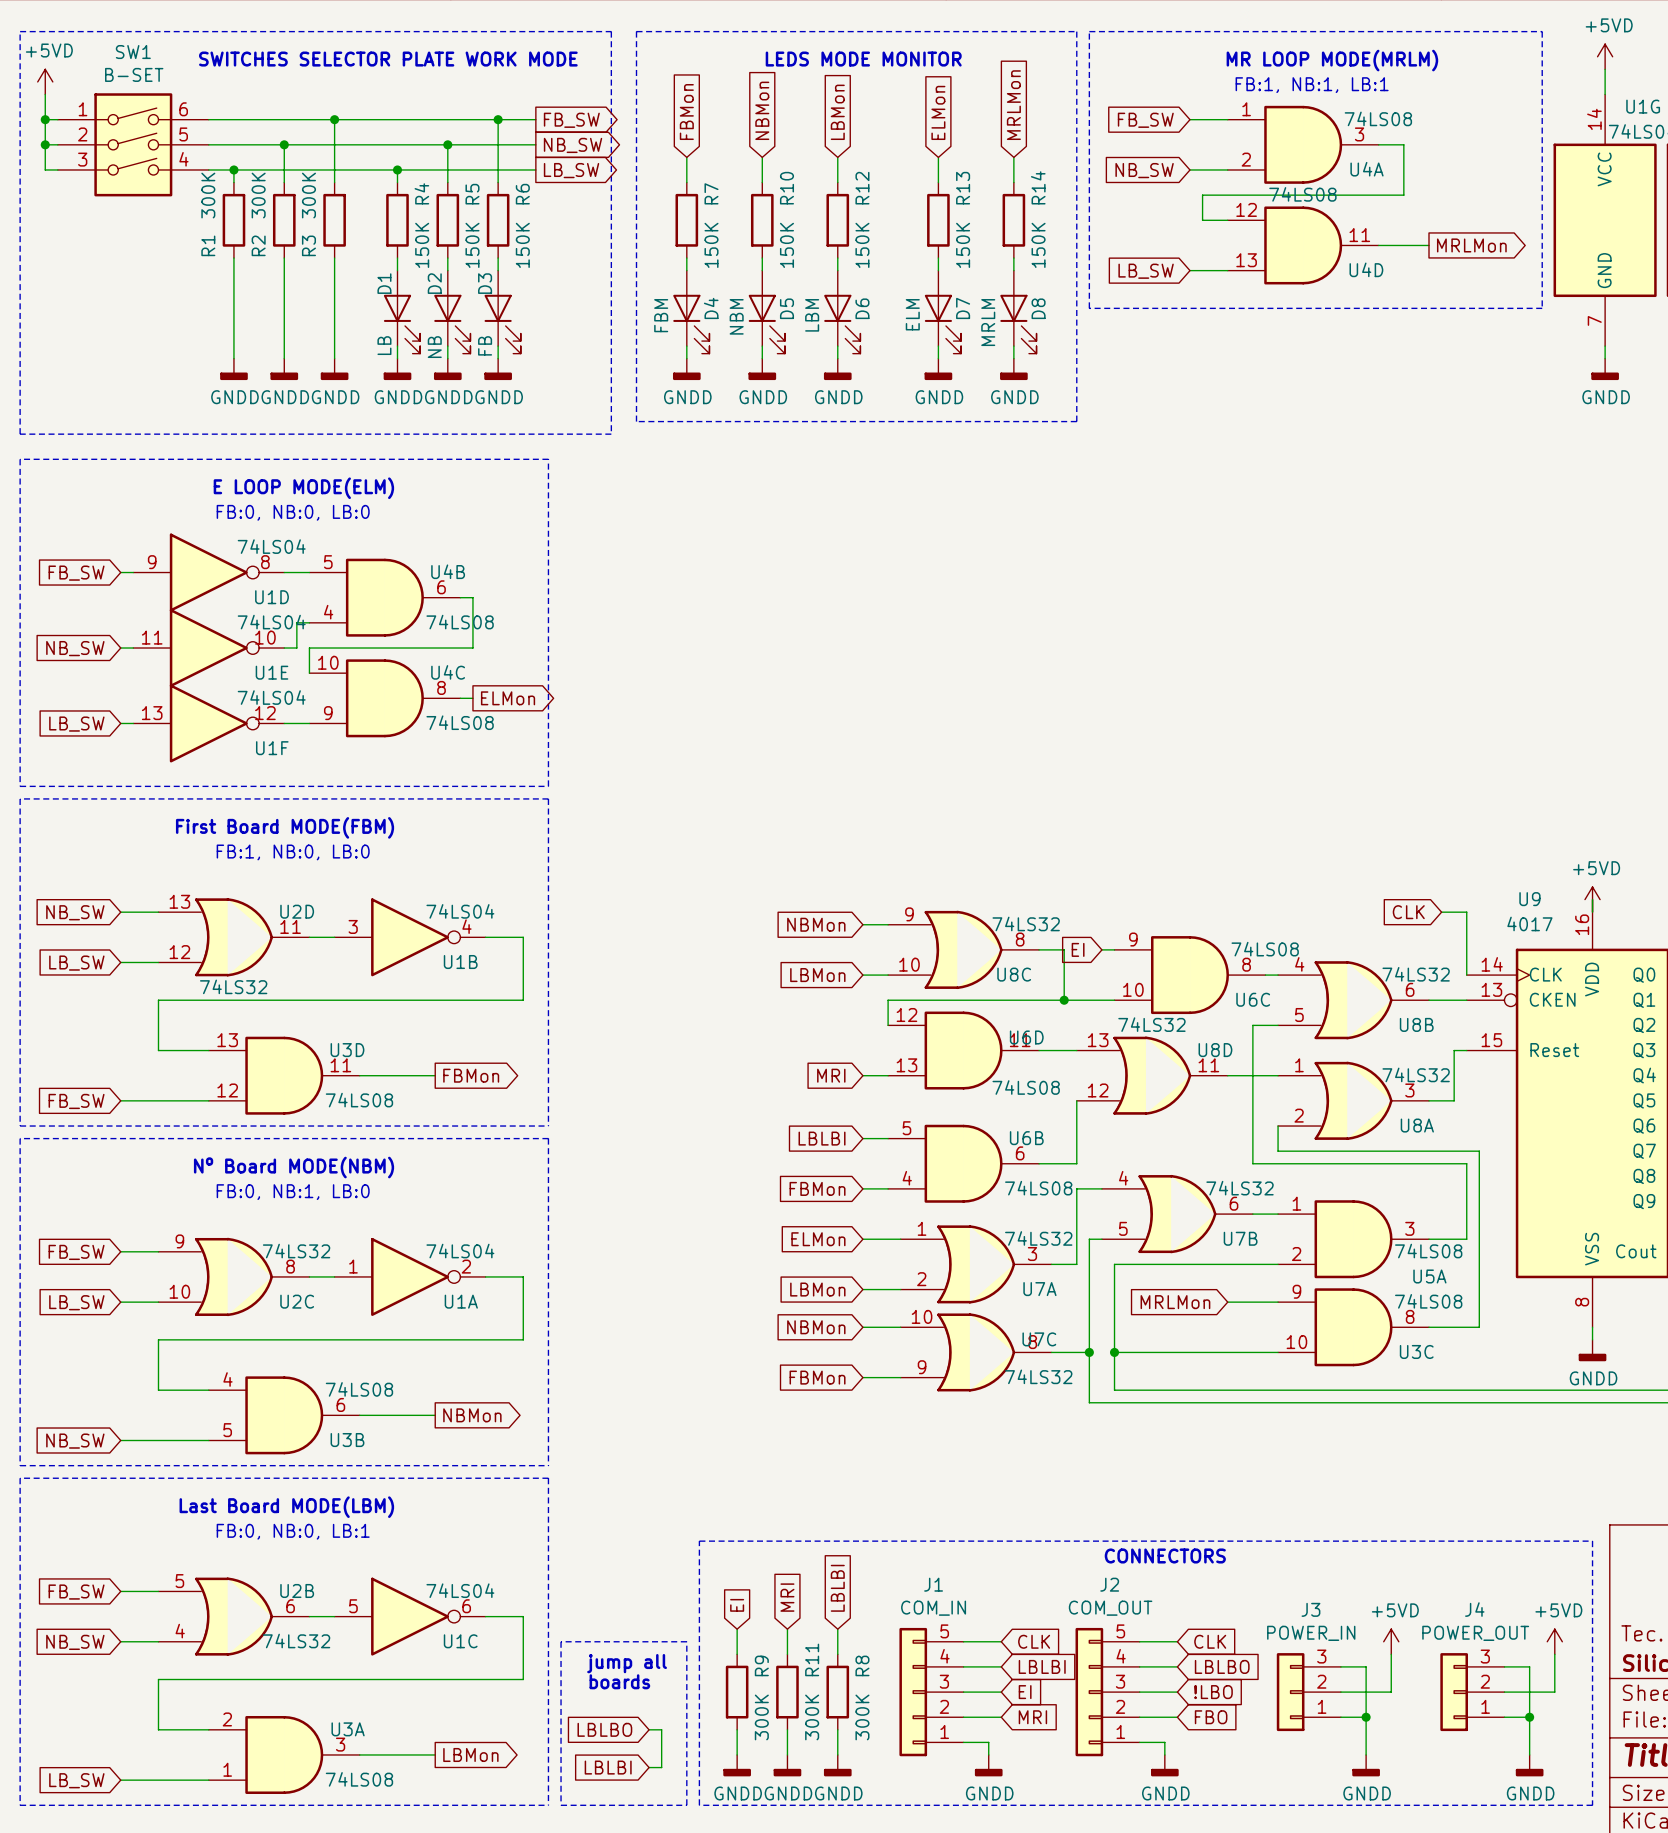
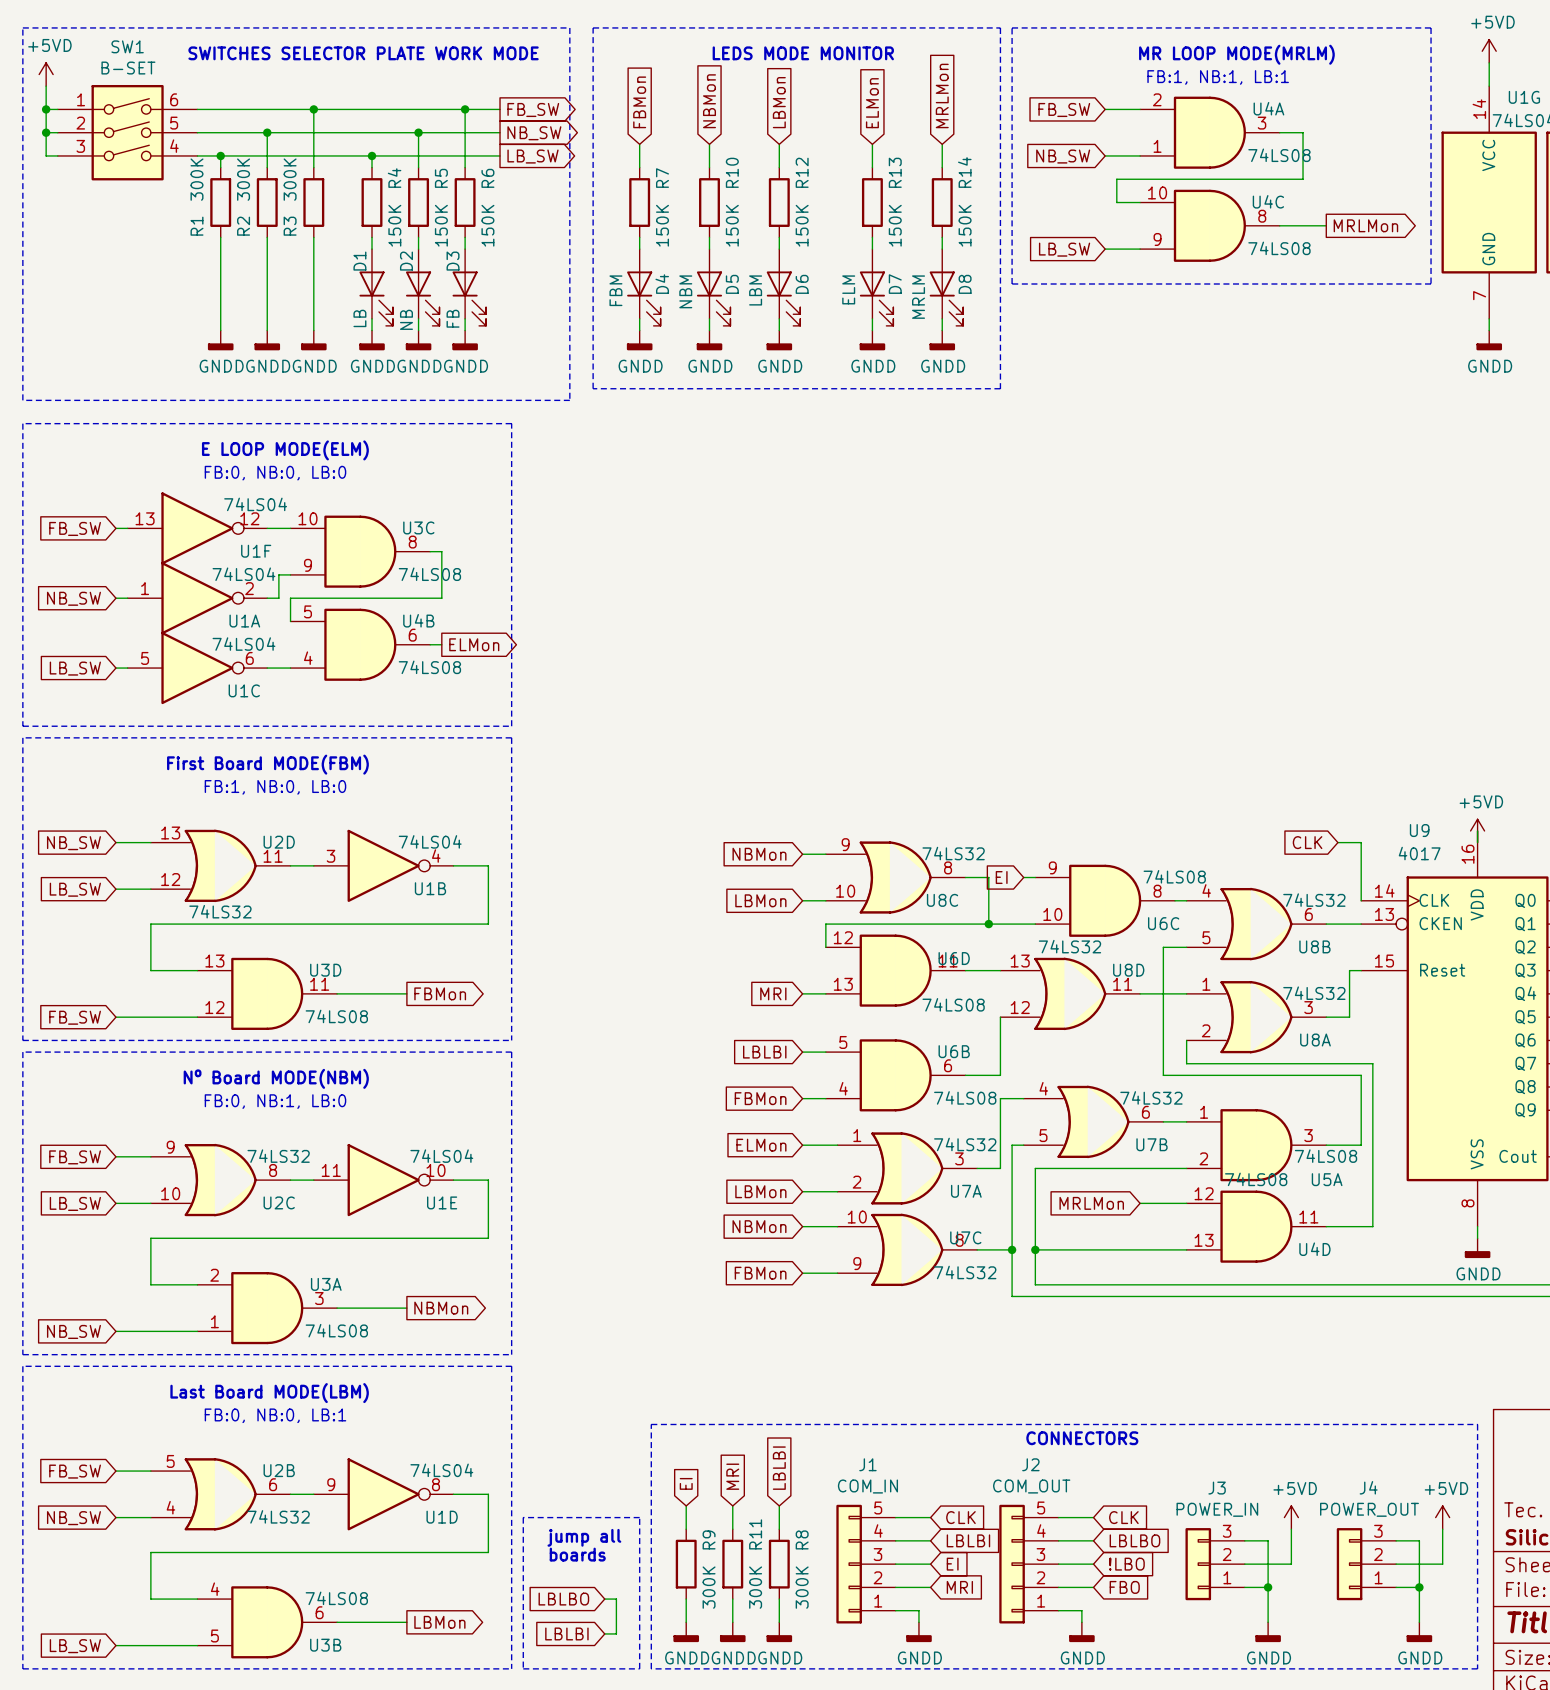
U4A flip: as is (1303, 144) -> up-down (1209, 132)
U4D position: (1303, 245) -> (1256, 1226)
U1D position: (208, 572) -> (383, 1494)
U4B position: (384, 597) -> (360, 644)
U1E position: (208, 648) -> (383, 1180)
U4C position: (384, 698) -> (1209, 225)
U1F position: (208, 723) -> (197, 528)
U1A position: (410, 1276) -> (197, 598)
U3C flip: as is (1353, 1327) -> up-down (360, 551)
U3C position: (1353, 1327) -> (360, 551)
U3B position: (284, 1415) -> (267, 1622)
U1C position: (410, 1616) -> (197, 668)
U3A position: (284, 1754) -> (267, 1308)

